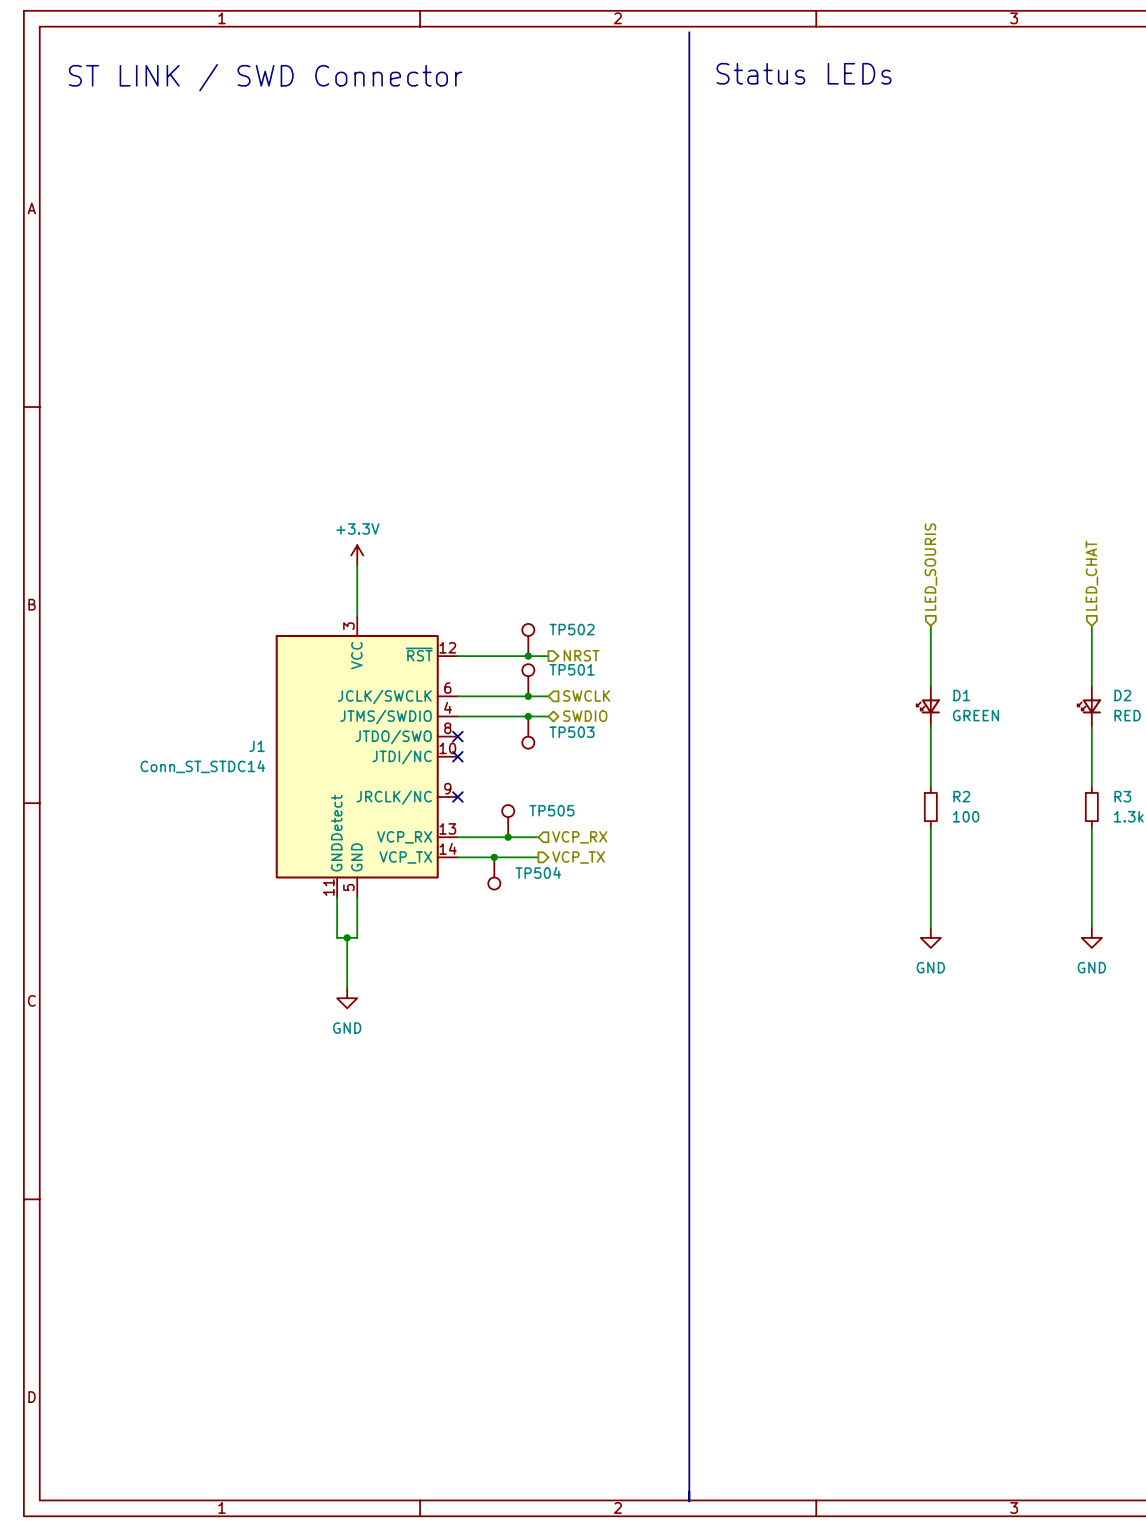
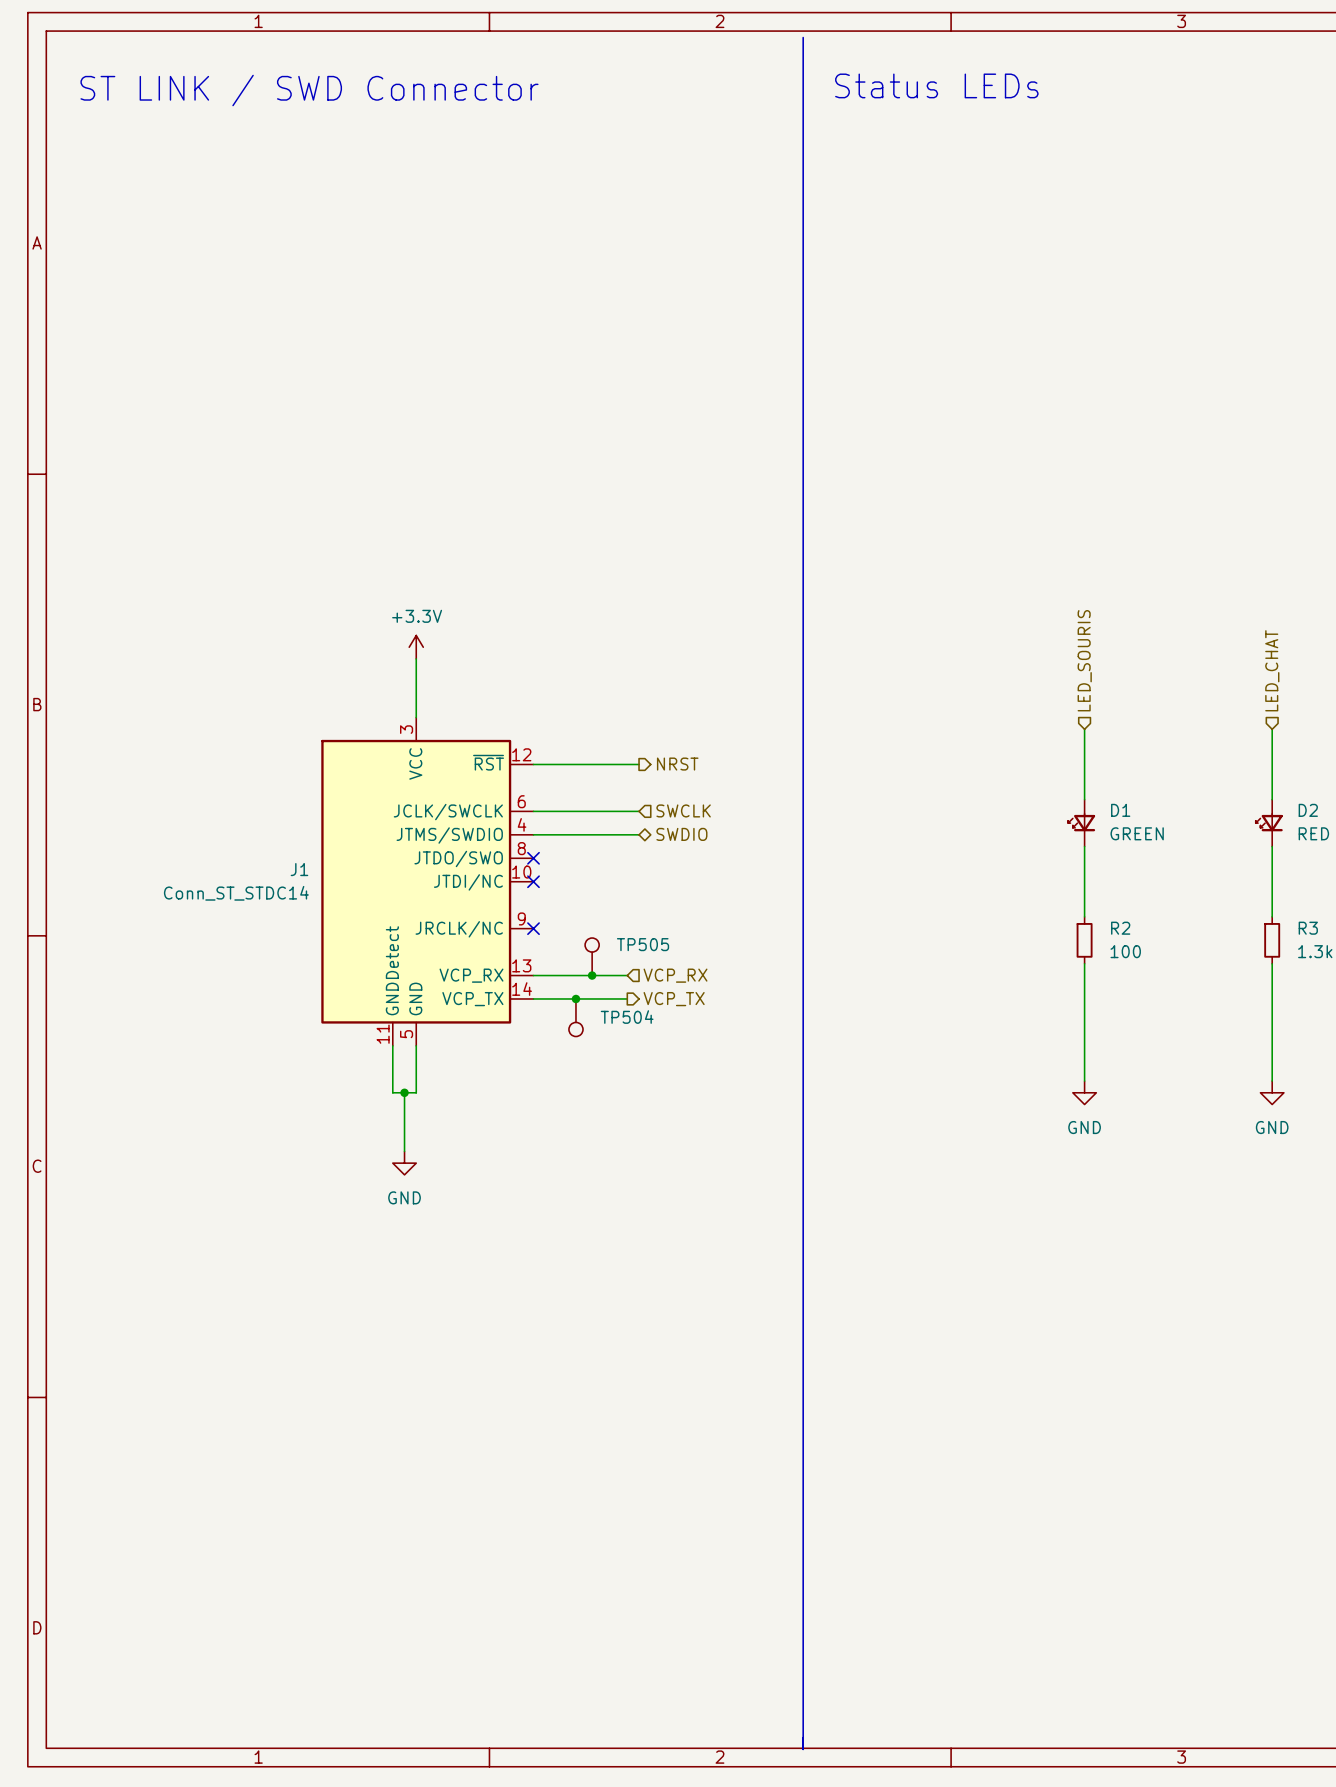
TP502: (528, 640) -> none
junction: (528, 656) -> none
TP501: (528, 680) -> none
junction: (528, 696) -> none
junction: (528, 716) -> none
TP503: (528, 732) -> none

